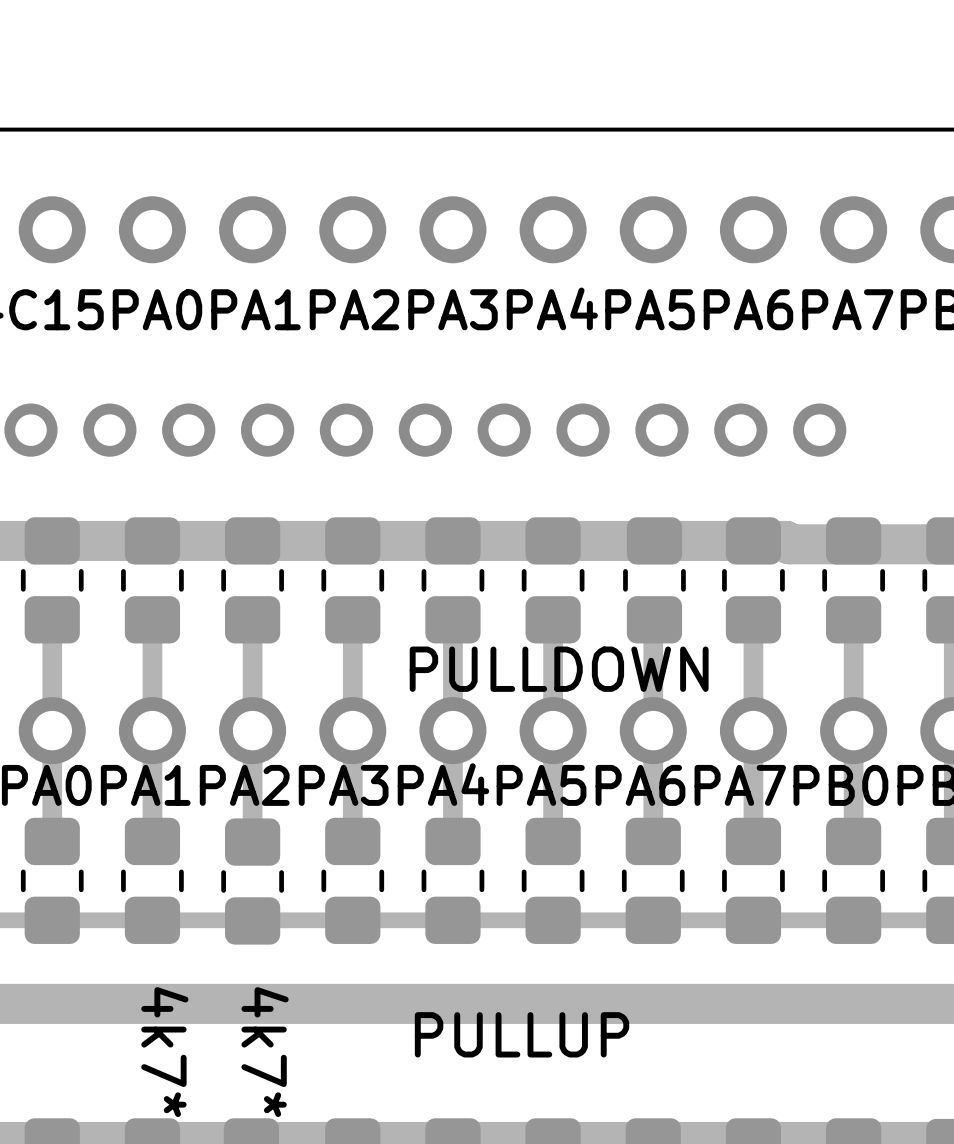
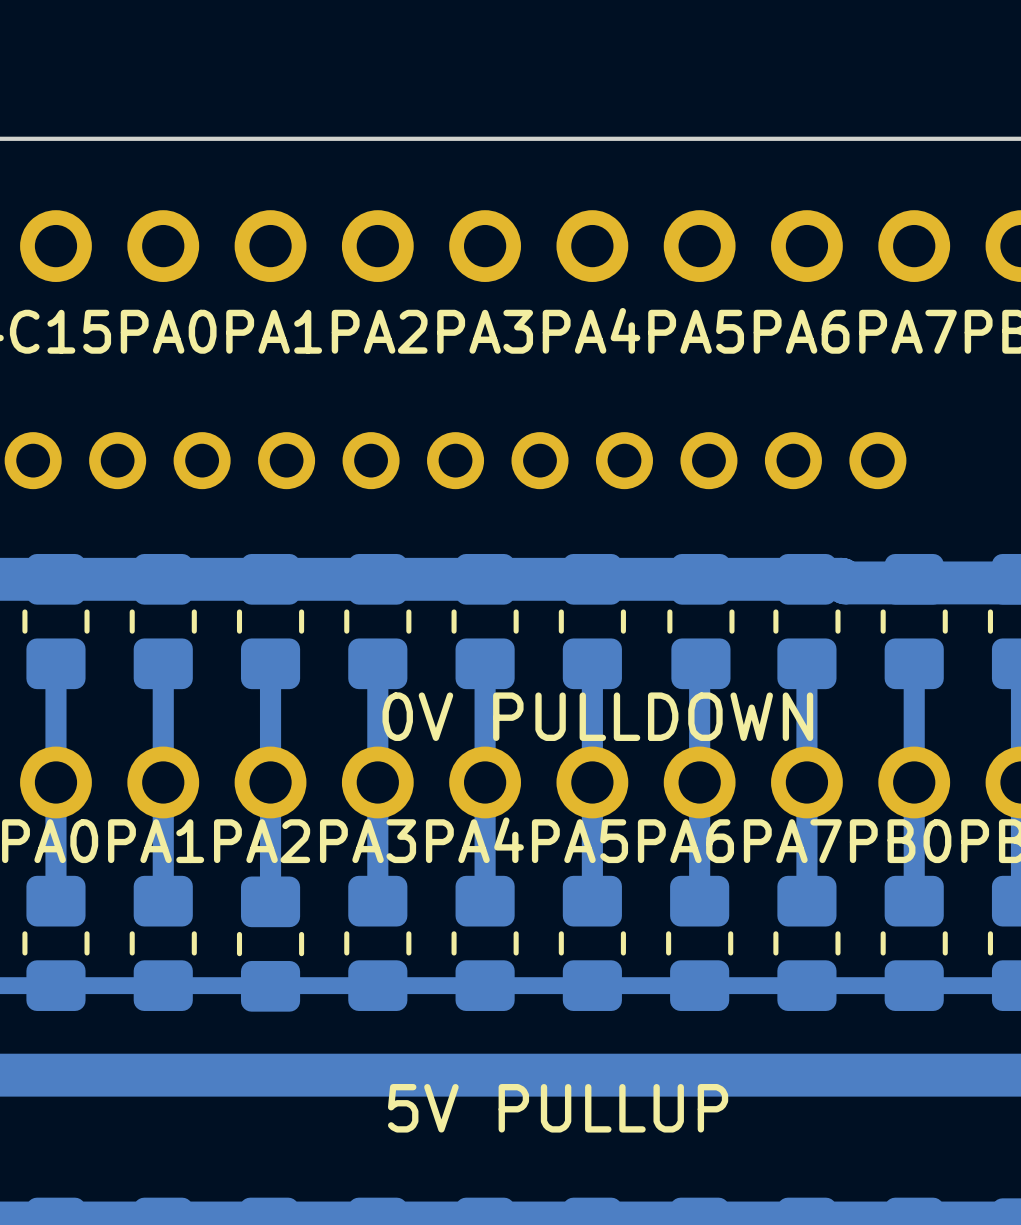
text: PULLDOWN (559, 669) -> 0V PULLDOWN (597, 716)
text: PULLUP (522, 1034) -> 5V PULLUP (558, 1108)
part value: 4k7* (164, 1052) -> none
part value: 4k7* (265, 1052) -> none

